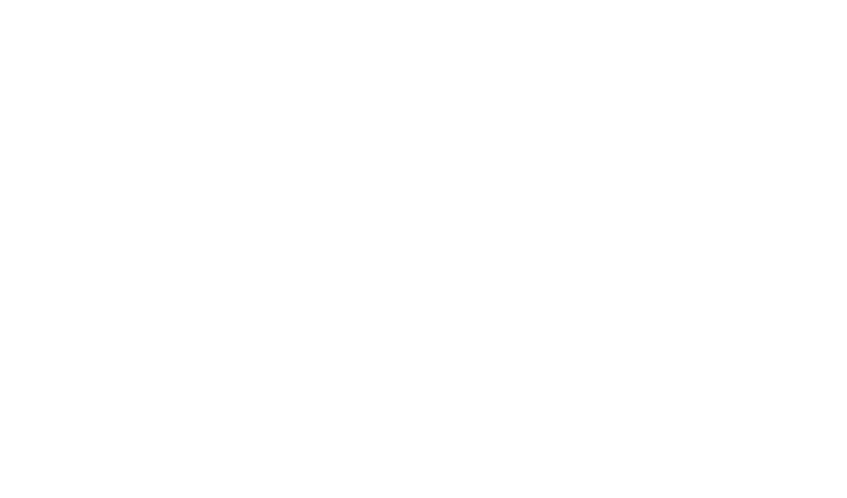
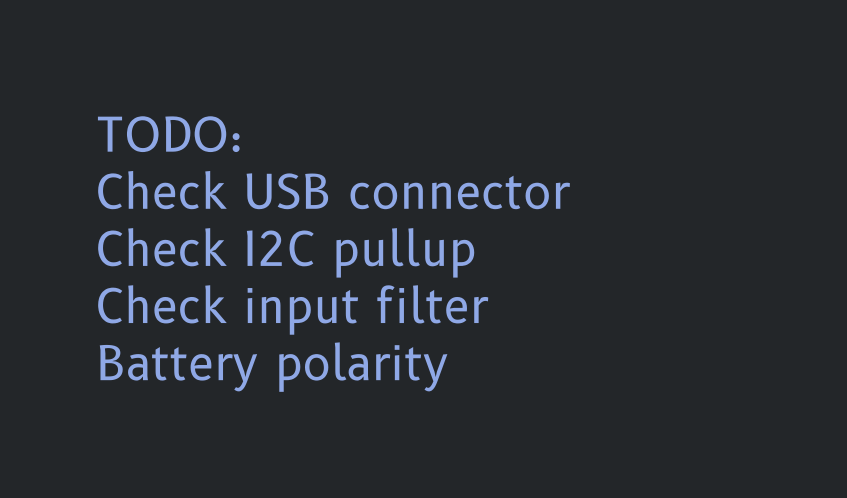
text: none -> TODO: (168, 134)
text: none -> Check USB connector (334, 190)
text: none -> Check I2C pullup (286, 252)
text: none -> Check input filter (293, 309)
text: none -> Battery polarity (273, 367)

